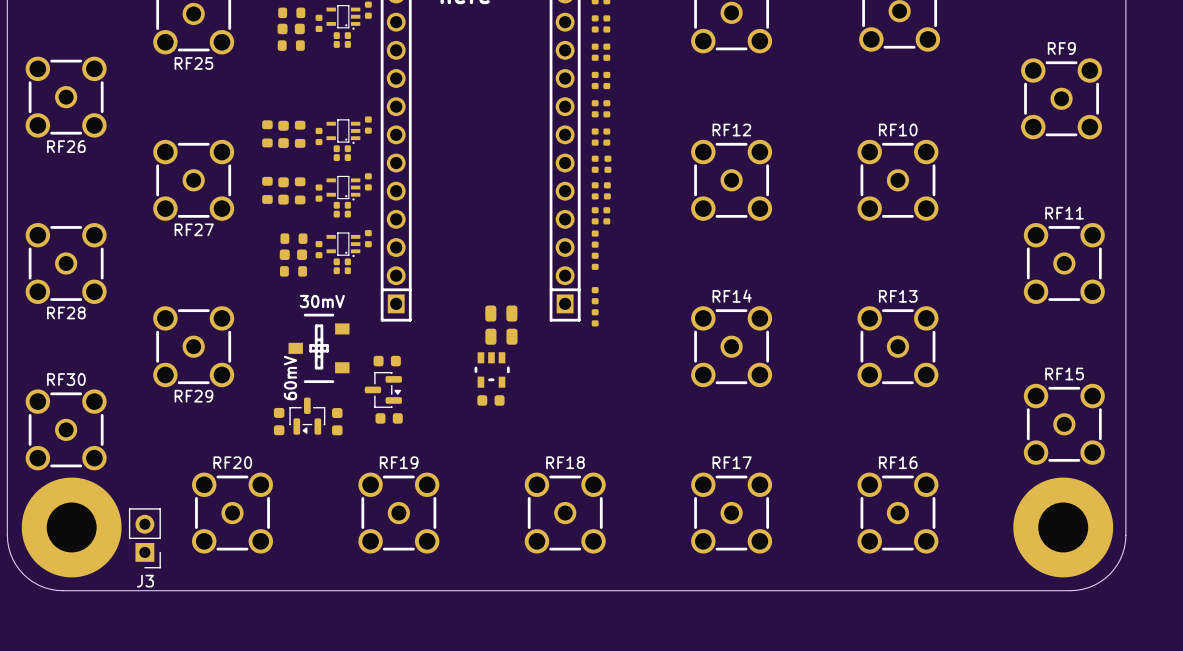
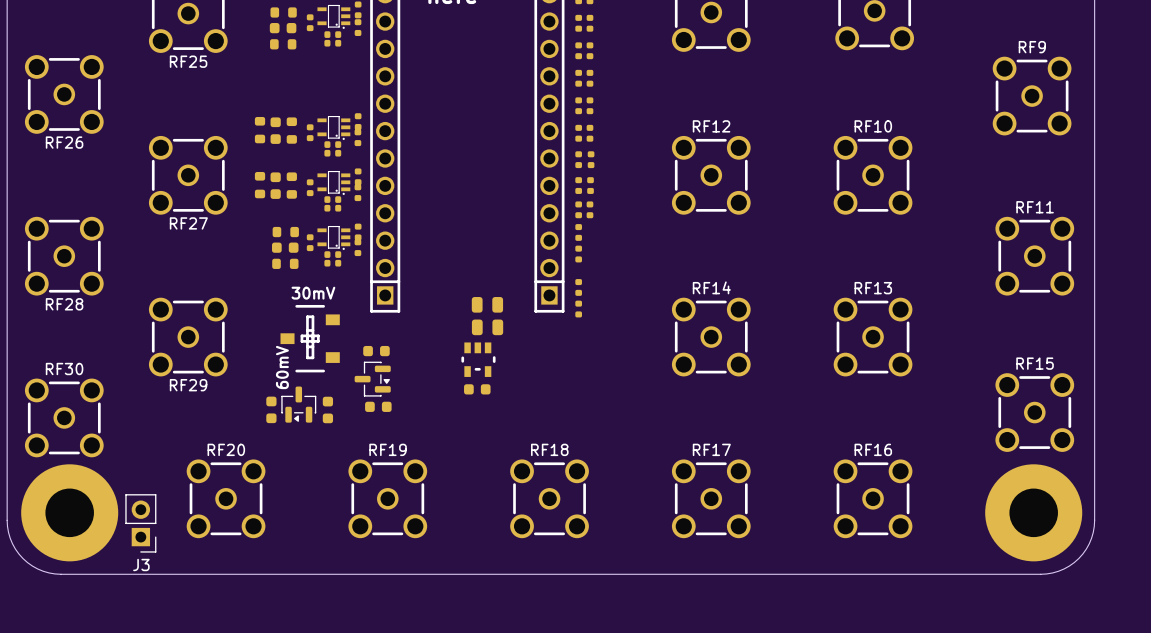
part: none -> (358, 27)
part: none -> (357, 137)
part: none -> (357, 192)
part: none -> (357, 247)

